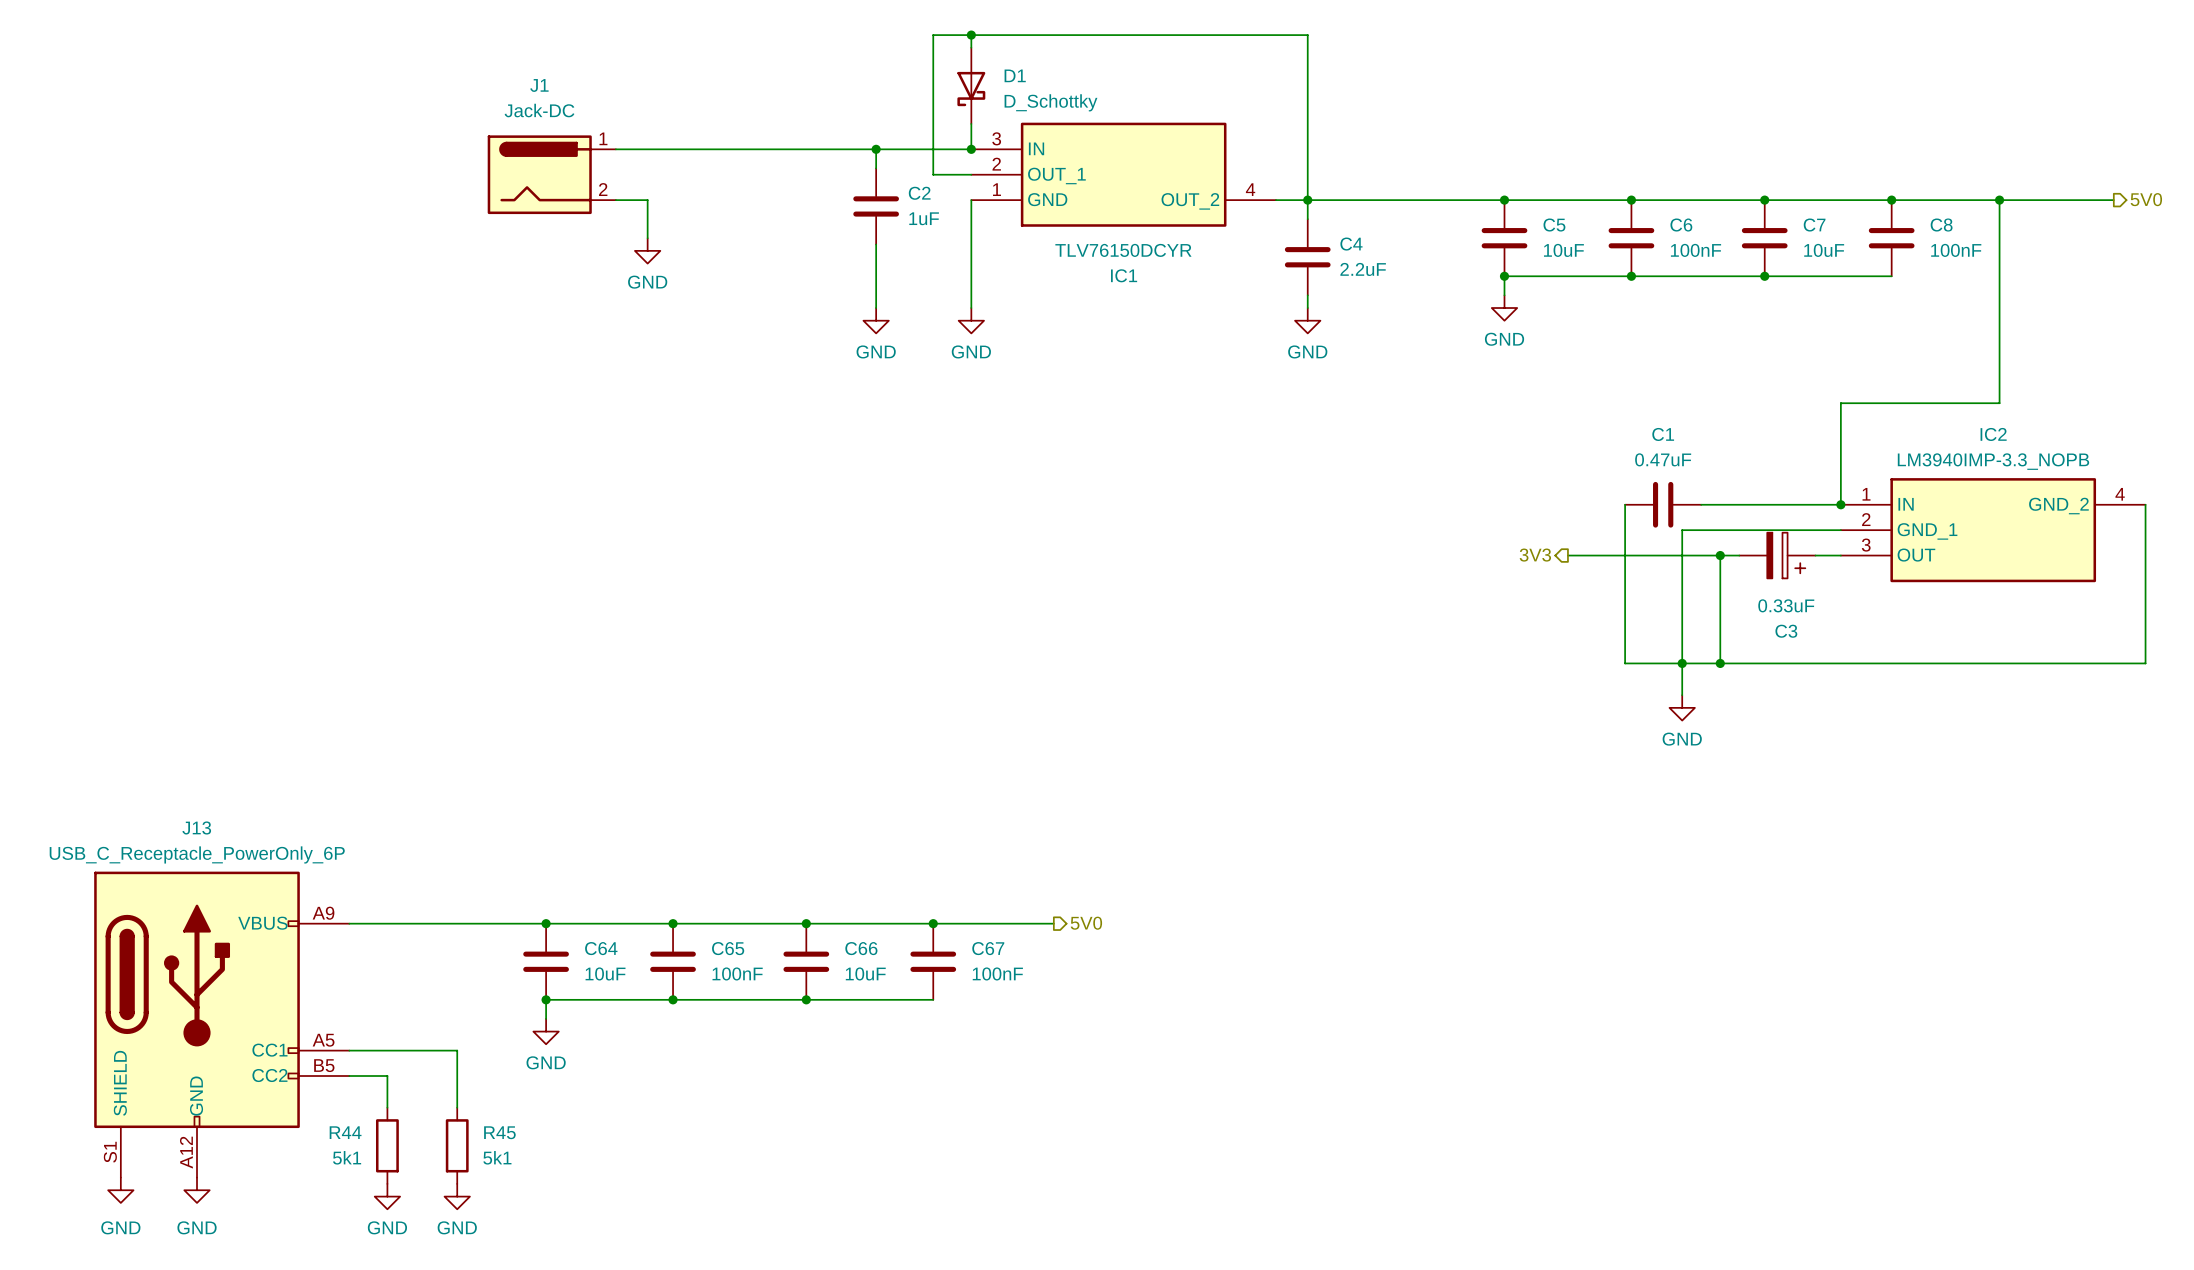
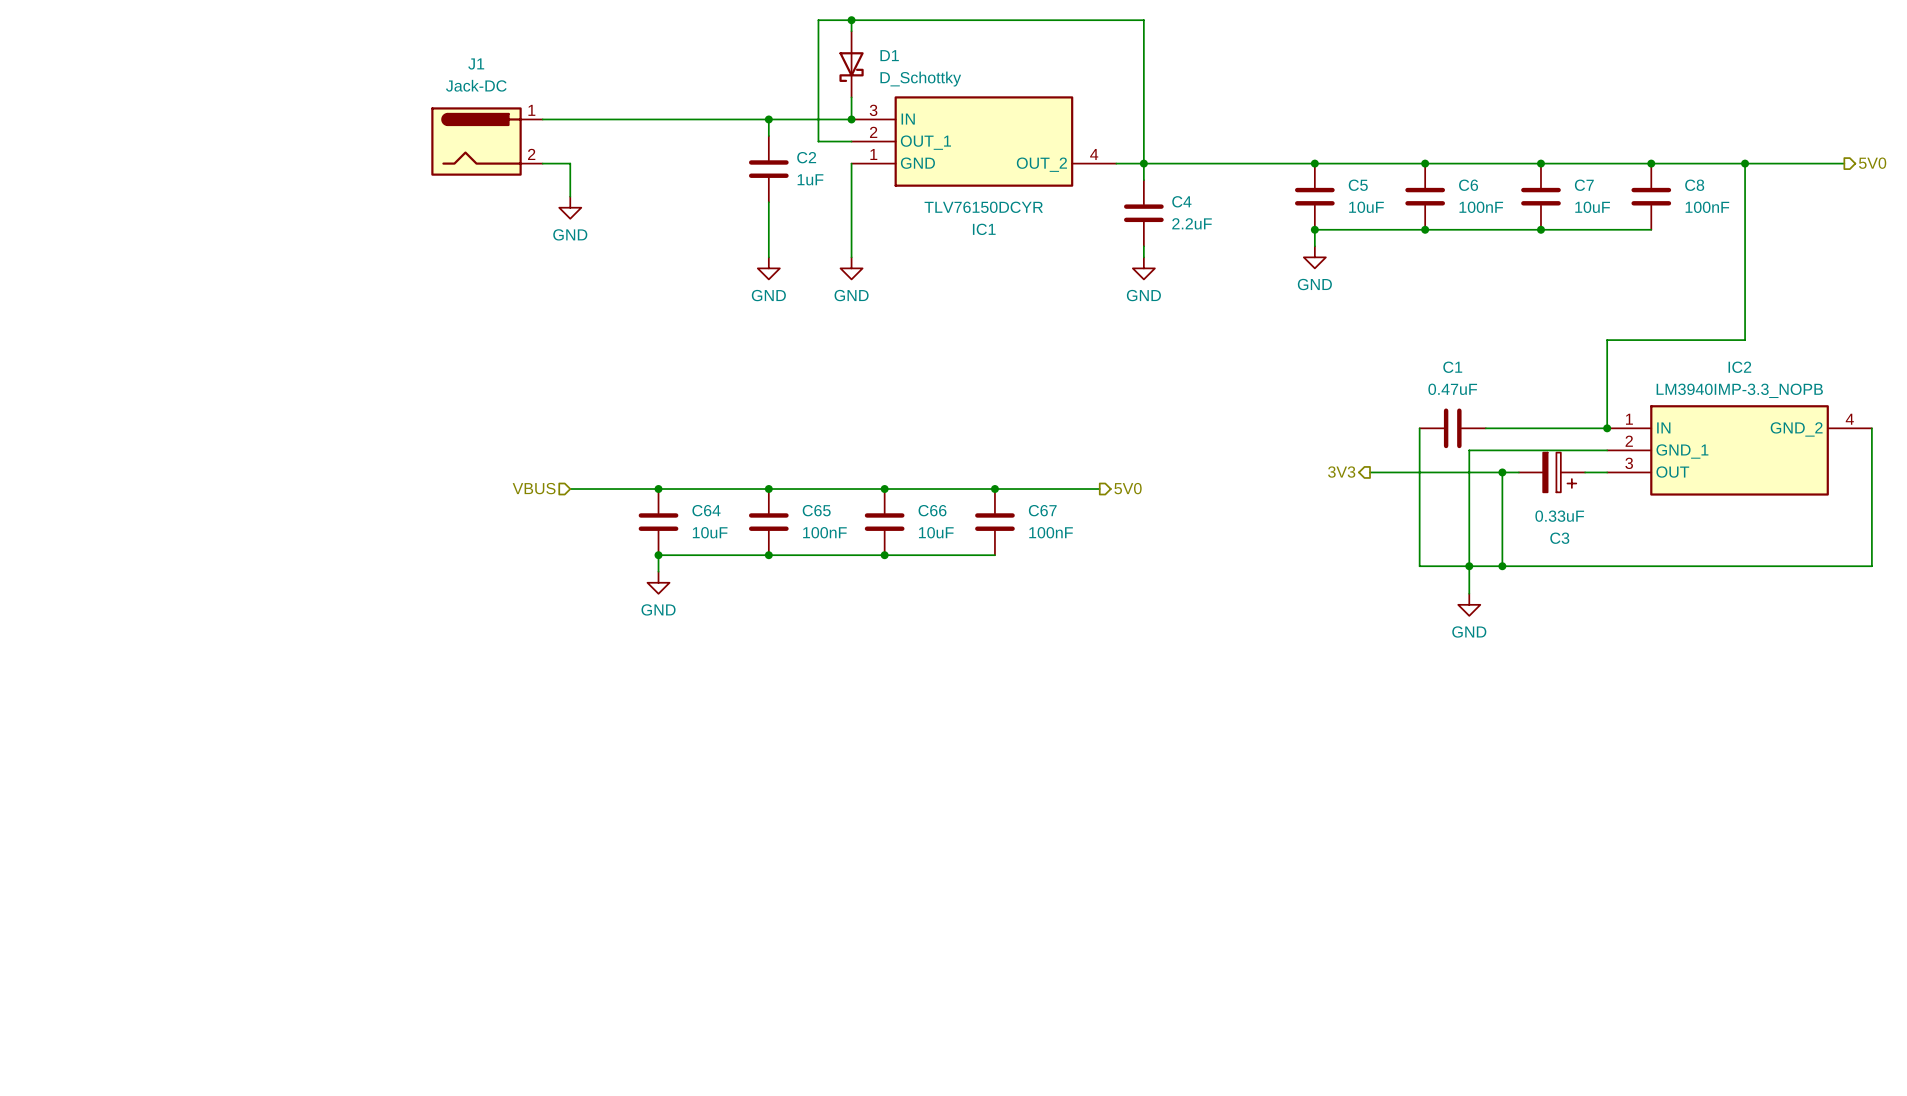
hierarchical label: none -> VBUS (534, 488)
wire: none -> (570, 489) (1099, 489)
junction: none -> (658, 489)
junction: none -> (768, 489)
junction: none -> (884, 489)
junction: none -> (994, 489)
hierarchical label: none -> 5V0 (1128, 488)
junction: none -> (658, 555)
junction: none -> (768, 555)
junction: none -> (884, 555)
wire: none -> (994, 555) (658, 555) (658, 571)
power symbol: none -> GND (658, 582)
wire: (349, 923) (1053, 923) -> none
junction: (546, 923) -> none
junction: (673, 923) -> none
junction: (806, 923) -> none
junction: (933, 923) -> none
hierarchical label: 5V0 (1086, 923) -> none
C64 position: (546, 961) -> (658, 522)
C65 position: (673, 961) -> (768, 522)
C66 position: (806, 961) -> (884, 522)
C67 position: (933, 961) -> (994, 522)
junction: (546, 999) -> none
junction: (673, 999) -> none
junction: (806, 999) -> none
wire: (933, 999) (546, 999) (546, 1018) -> none
J13: USB_C_Receptacle_PowerOnly_6P (221, 1024) -> none
power symbol: GND (546, 1031) -> none
wire: (349, 1050) (457, 1050) (457, 1107) -> none
wire: (349, 1076) (387, 1076) (387, 1107) -> none
R44: 5k1 (387, 1145) -> none
R45: 5k1 (457, 1145) -> none
power symbol: GND (120, 1190) -> none
power symbol: GND (197, 1190) -> none
power symbol: GND (387, 1196) -> none
power symbol: GND (457, 1196) -> none

